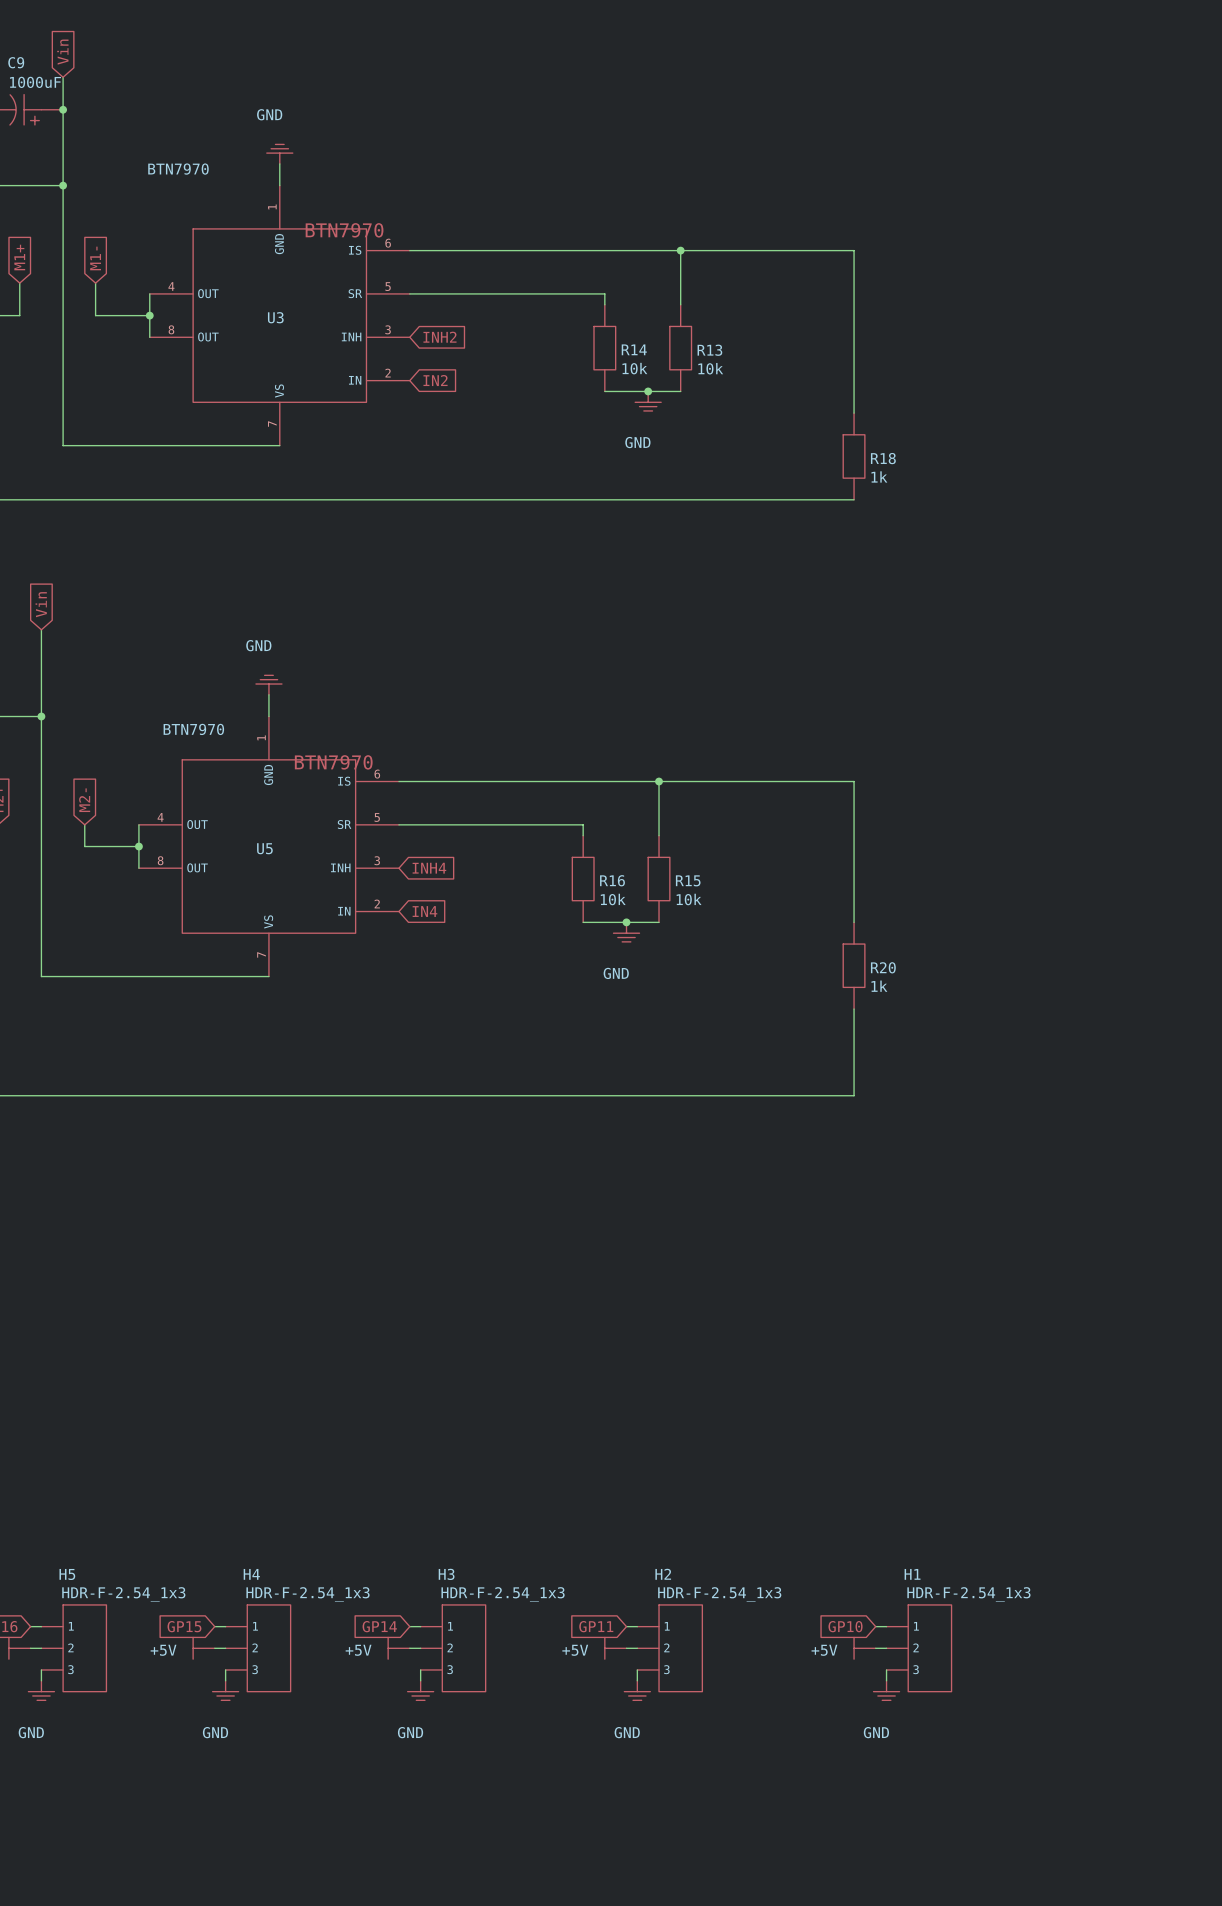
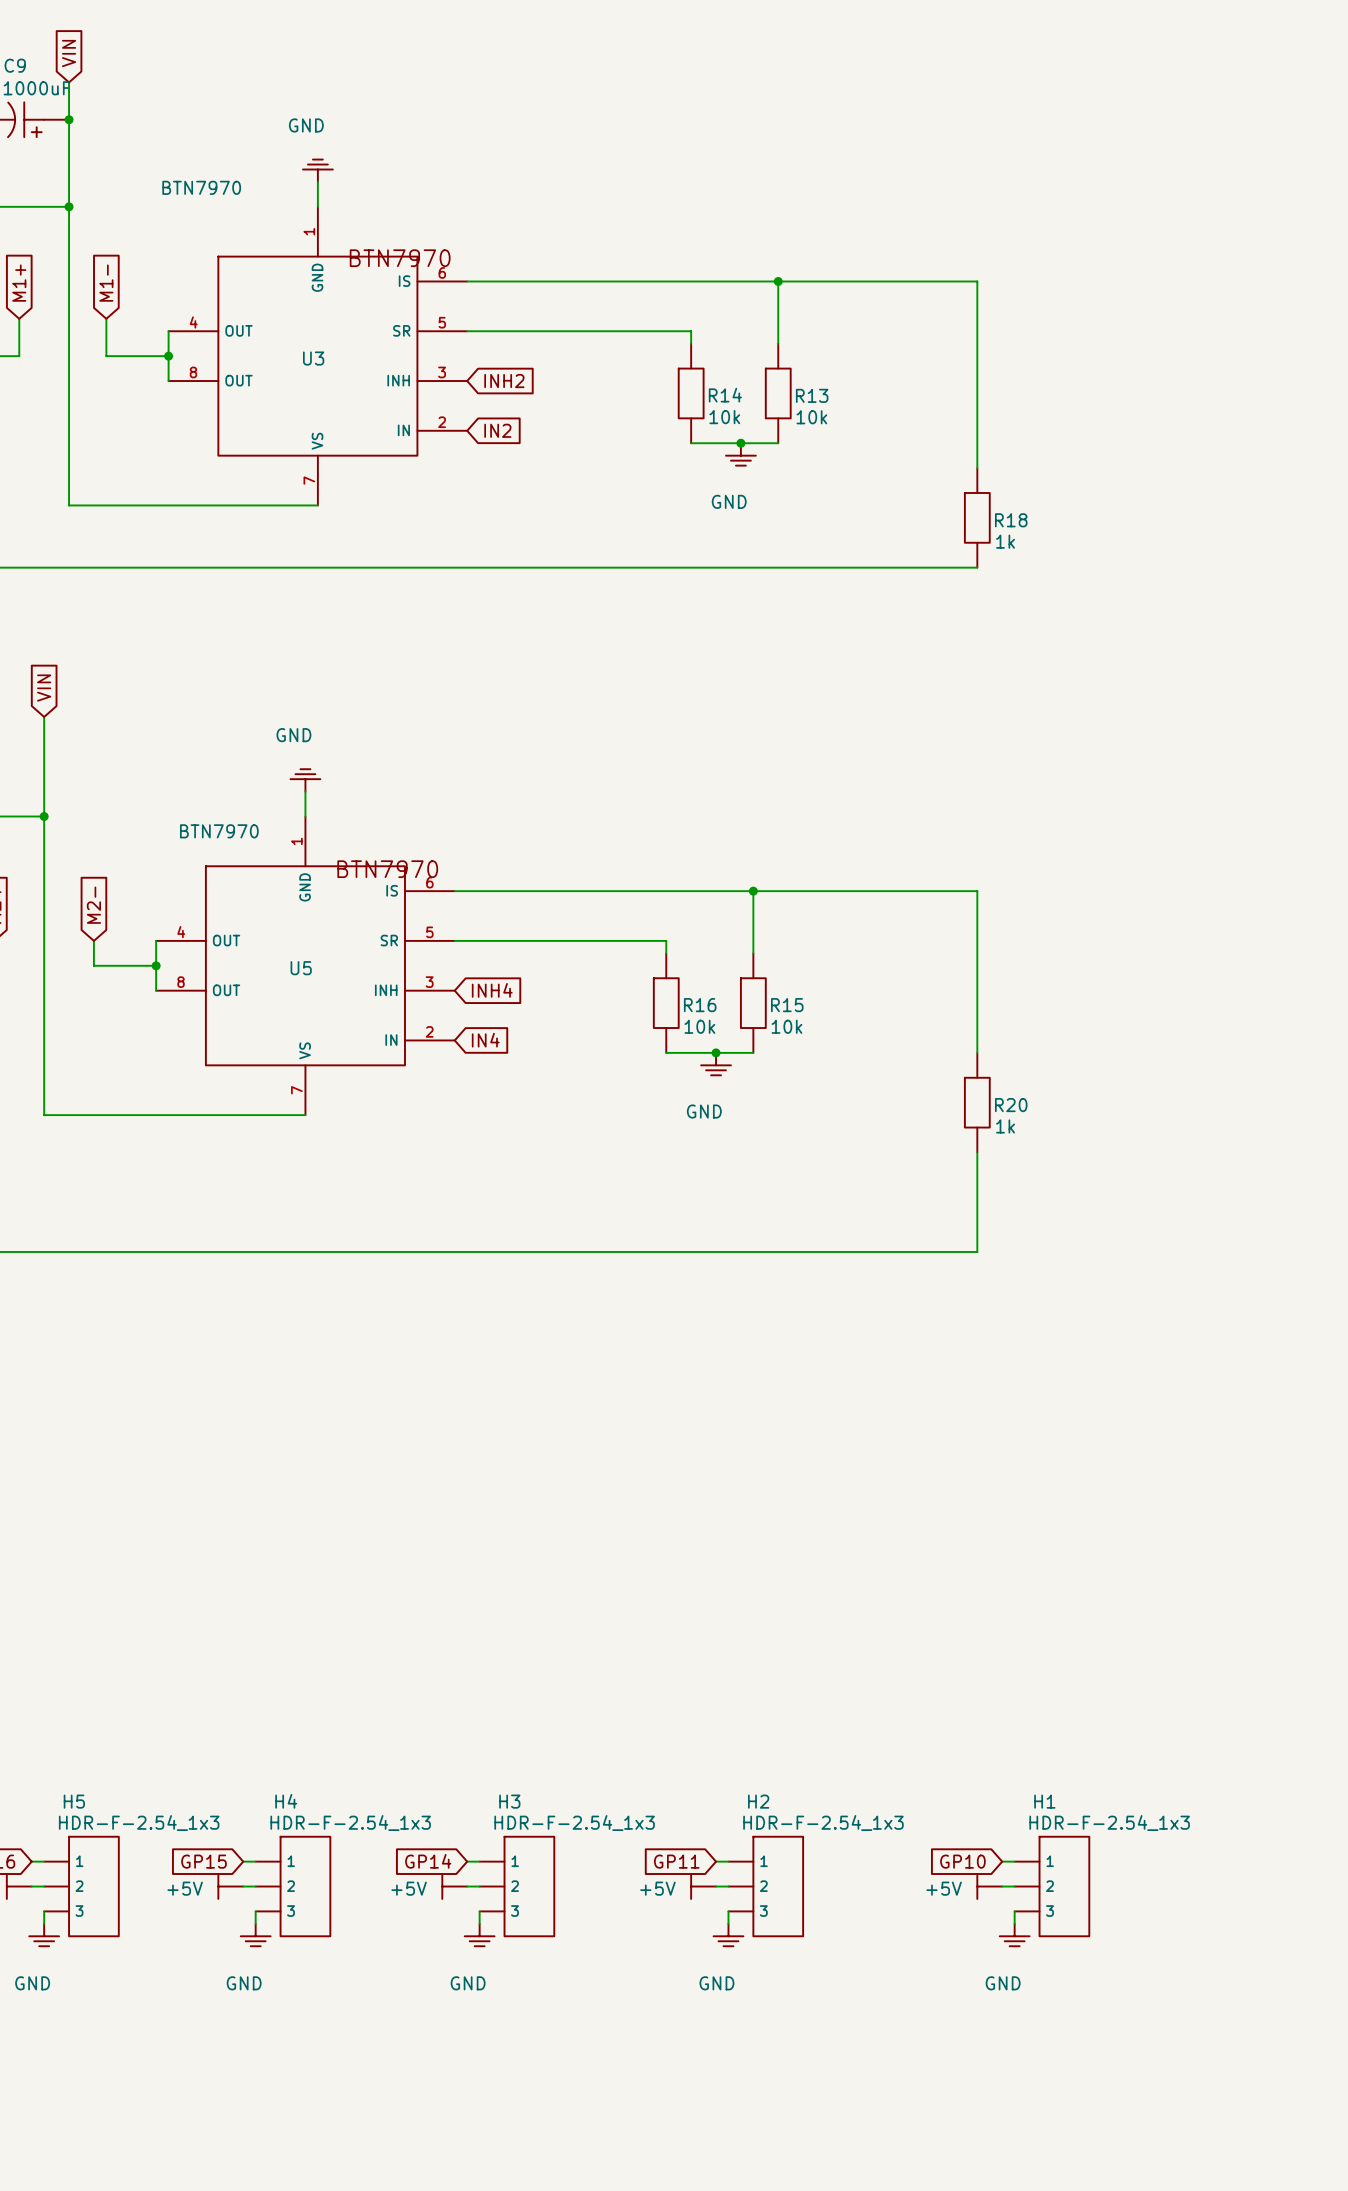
global label: Vin (62, 52) -> VIN (69, 53)
global label: Vin (41, 604) -> VIN (44, 688)

